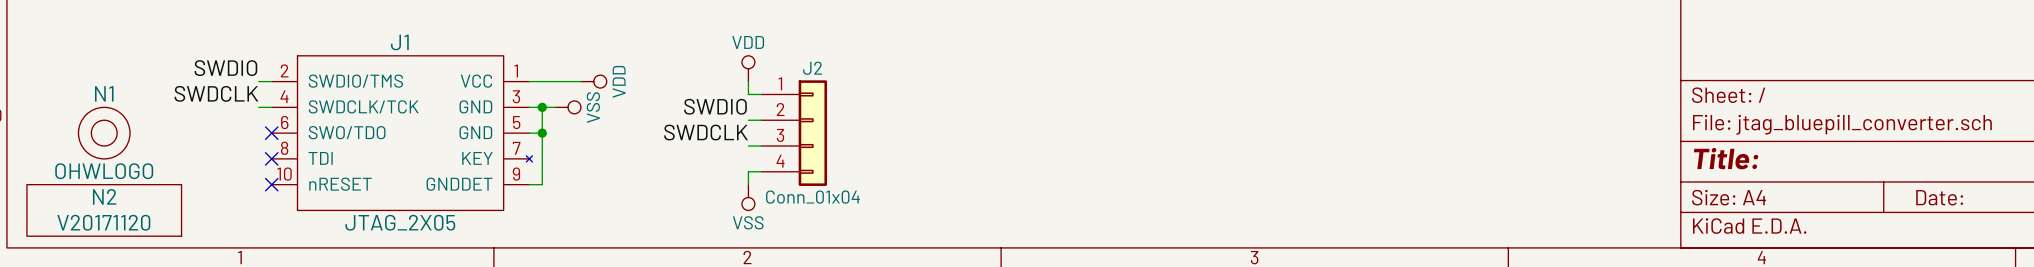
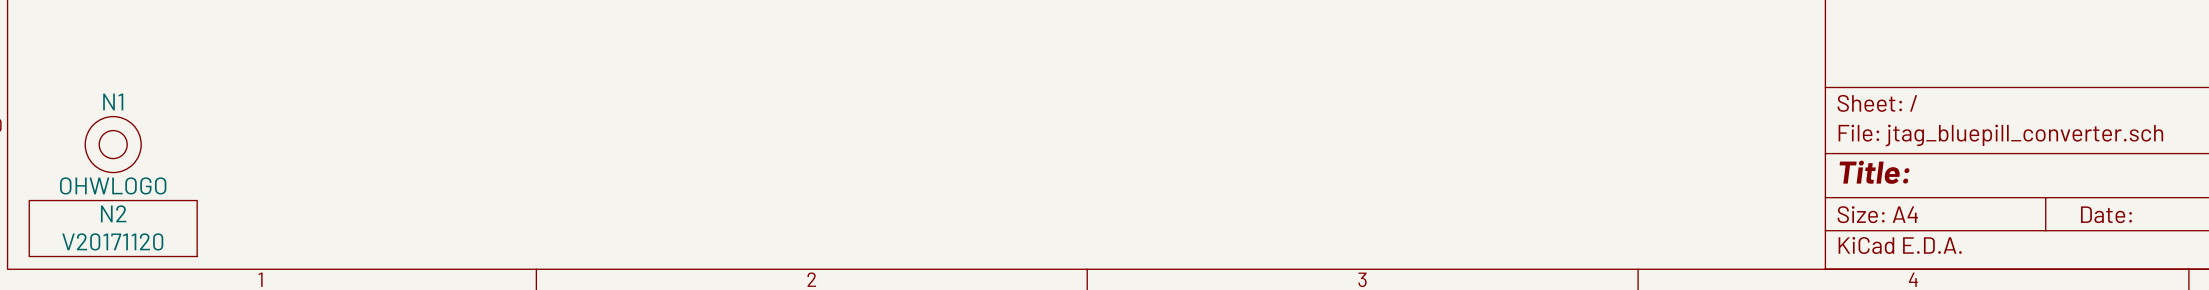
label: SWDIO (225, 68) -> none
power symbol: VDD (748, 68) -> none
wire: (258, 81) (271, 81) -> none
wire: (529, 81) (580, 81) -> none
power symbol: VDD (593, 81) -> none
wire: (748, 81) (748, 94) (761, 94) -> none
label: SWDCLK (216, 93) -> none
label: SWDIO (715, 106) -> none
wire: (258, 107) (271, 107) -> none
wire: (529, 107) (555, 107) -> none
wire: (542, 107) (542, 184) (529, 184) -> none
junction: (542, 107) -> none
power symbol: VSS (568, 107) -> none
wire: (748, 120) (761, 120) -> none
label: SWDCLK (706, 132) -> none
no-connect mark: (271, 133) -> none
J1: JTAG_2X05 (402, 133) -> none
wire: (529, 133) (542, 133) -> none
junction: (542, 133) -> none
J2: Conn_01x04 (794, 133) -> none
wire: (748, 146) (761, 146) -> none
no-connect mark: (271, 158) -> none
wire: (761, 171) (748, 171) (748, 184) -> none
no-connect mark: (271, 184) -> none
power symbol: VSS (748, 197) -> none

